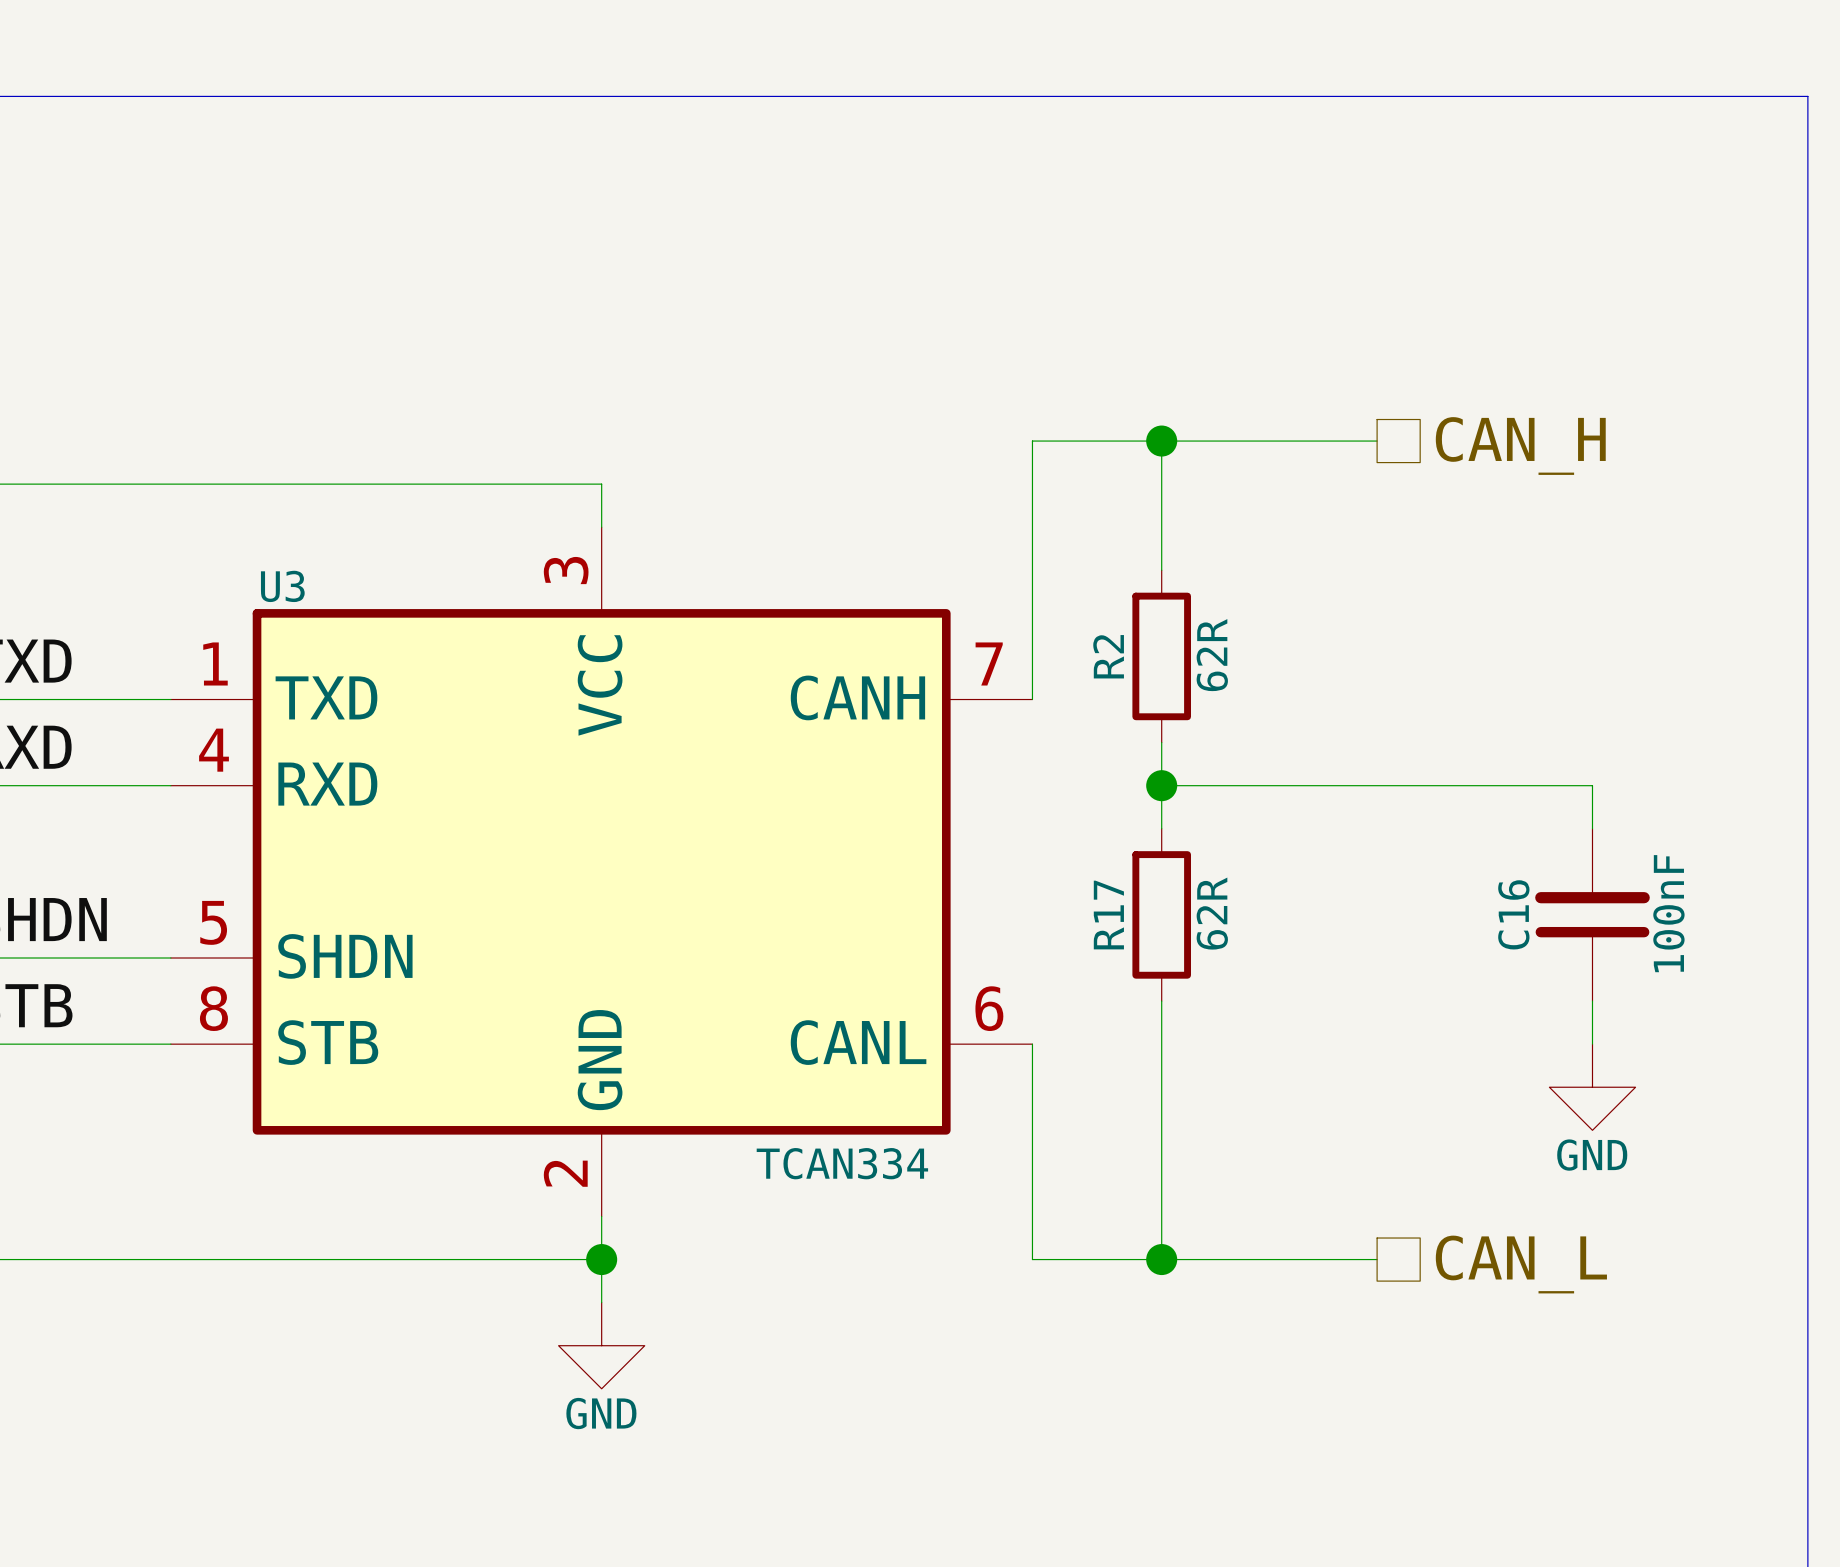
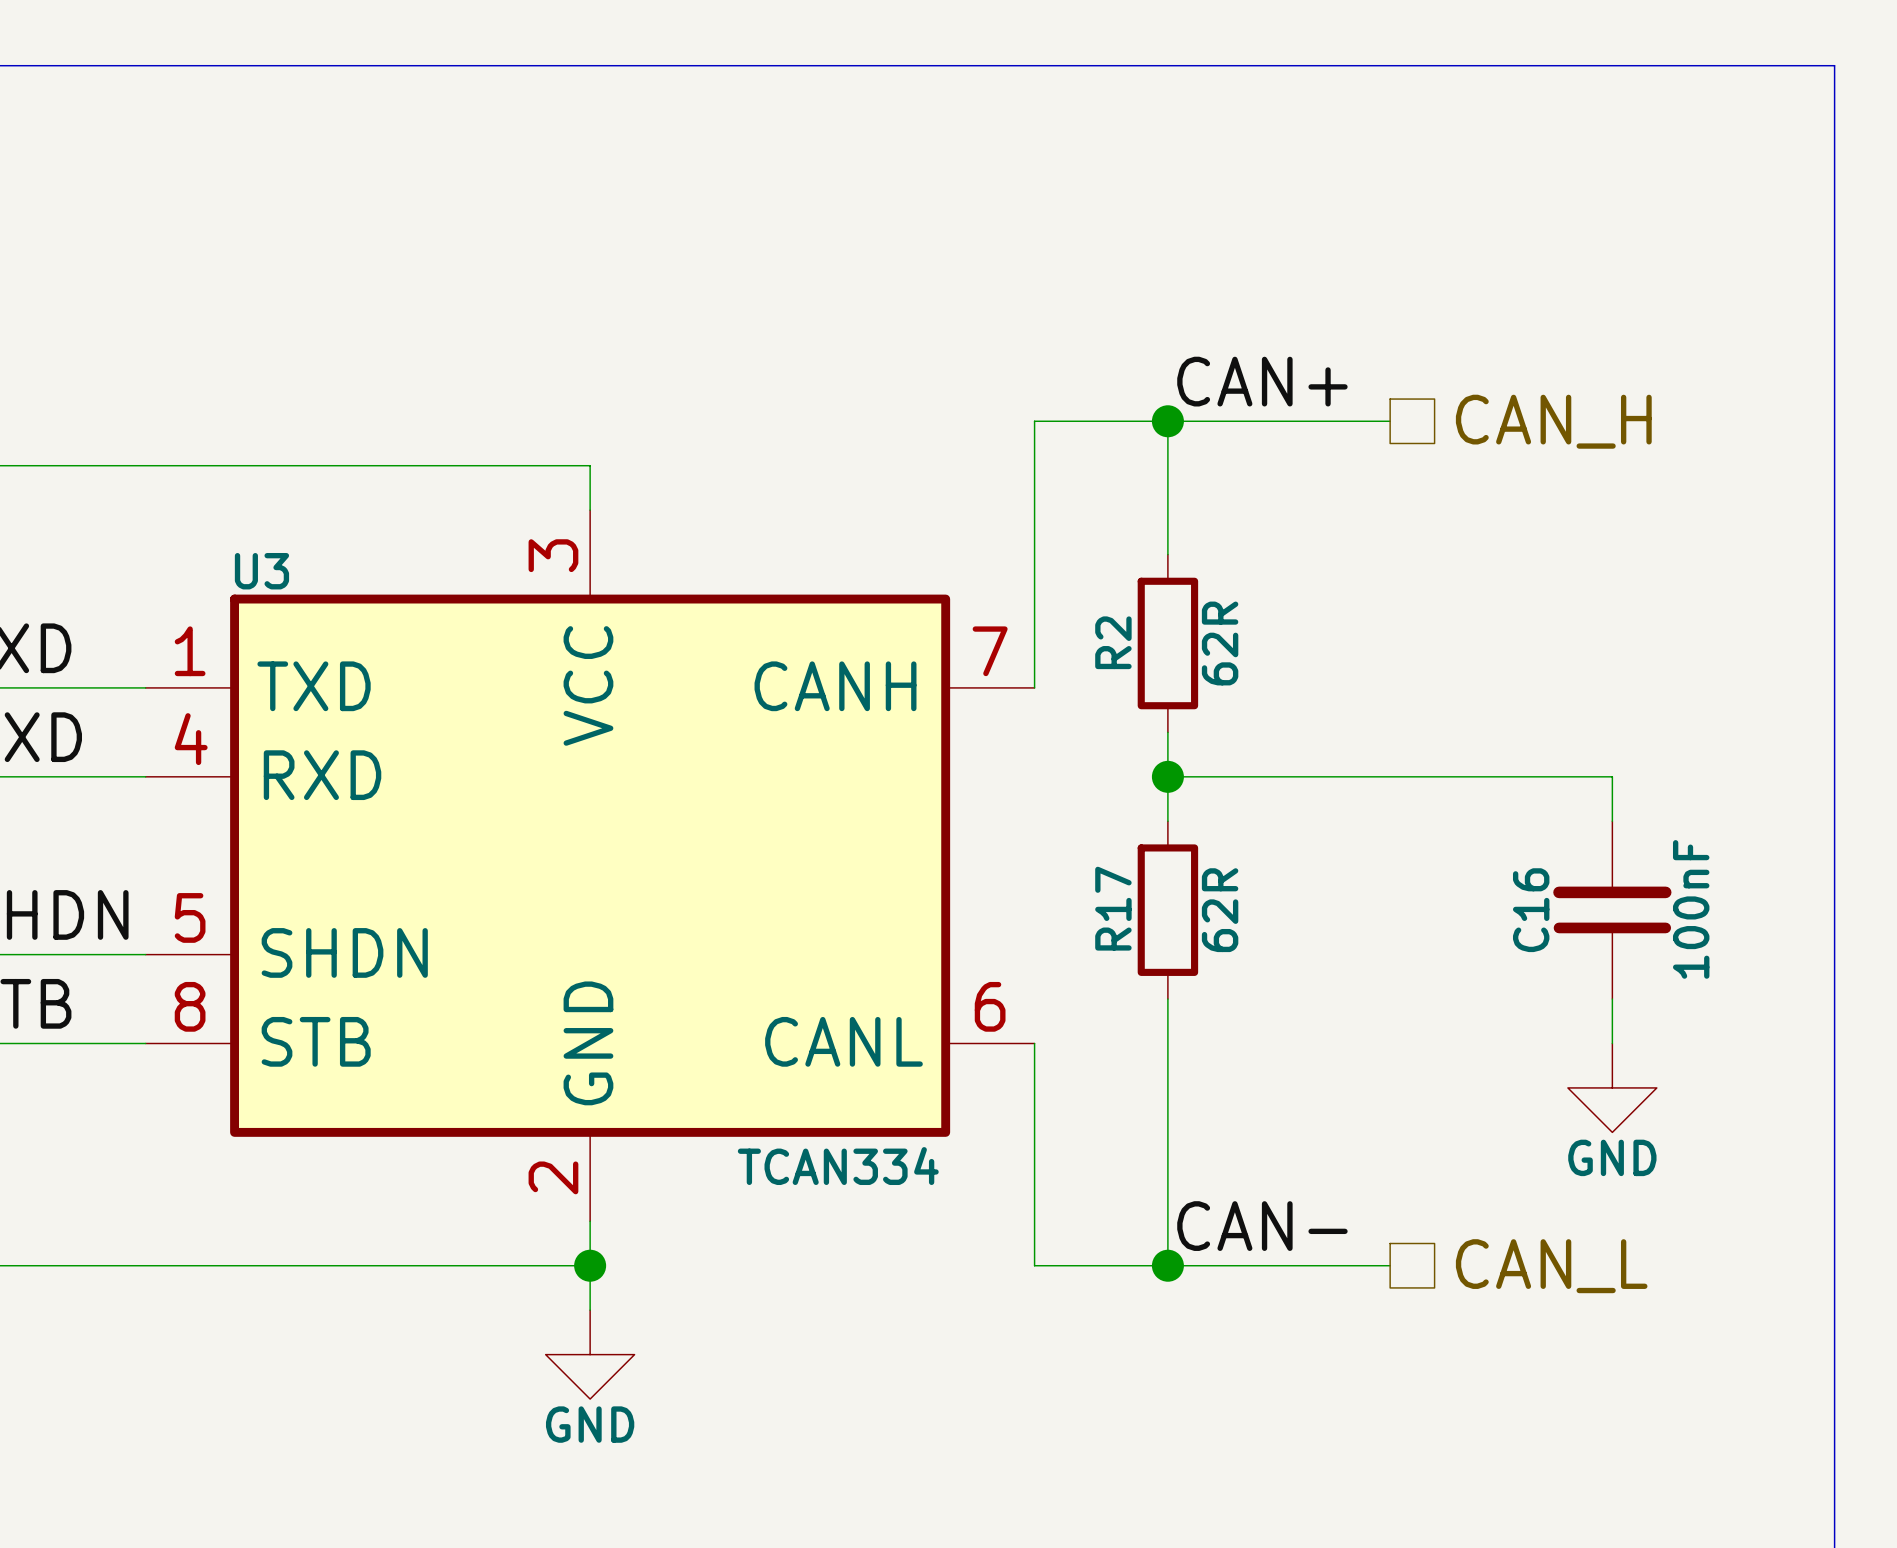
label: none -> CAN+ (1262, 381)
label: none -> CAN- (1262, 1226)

